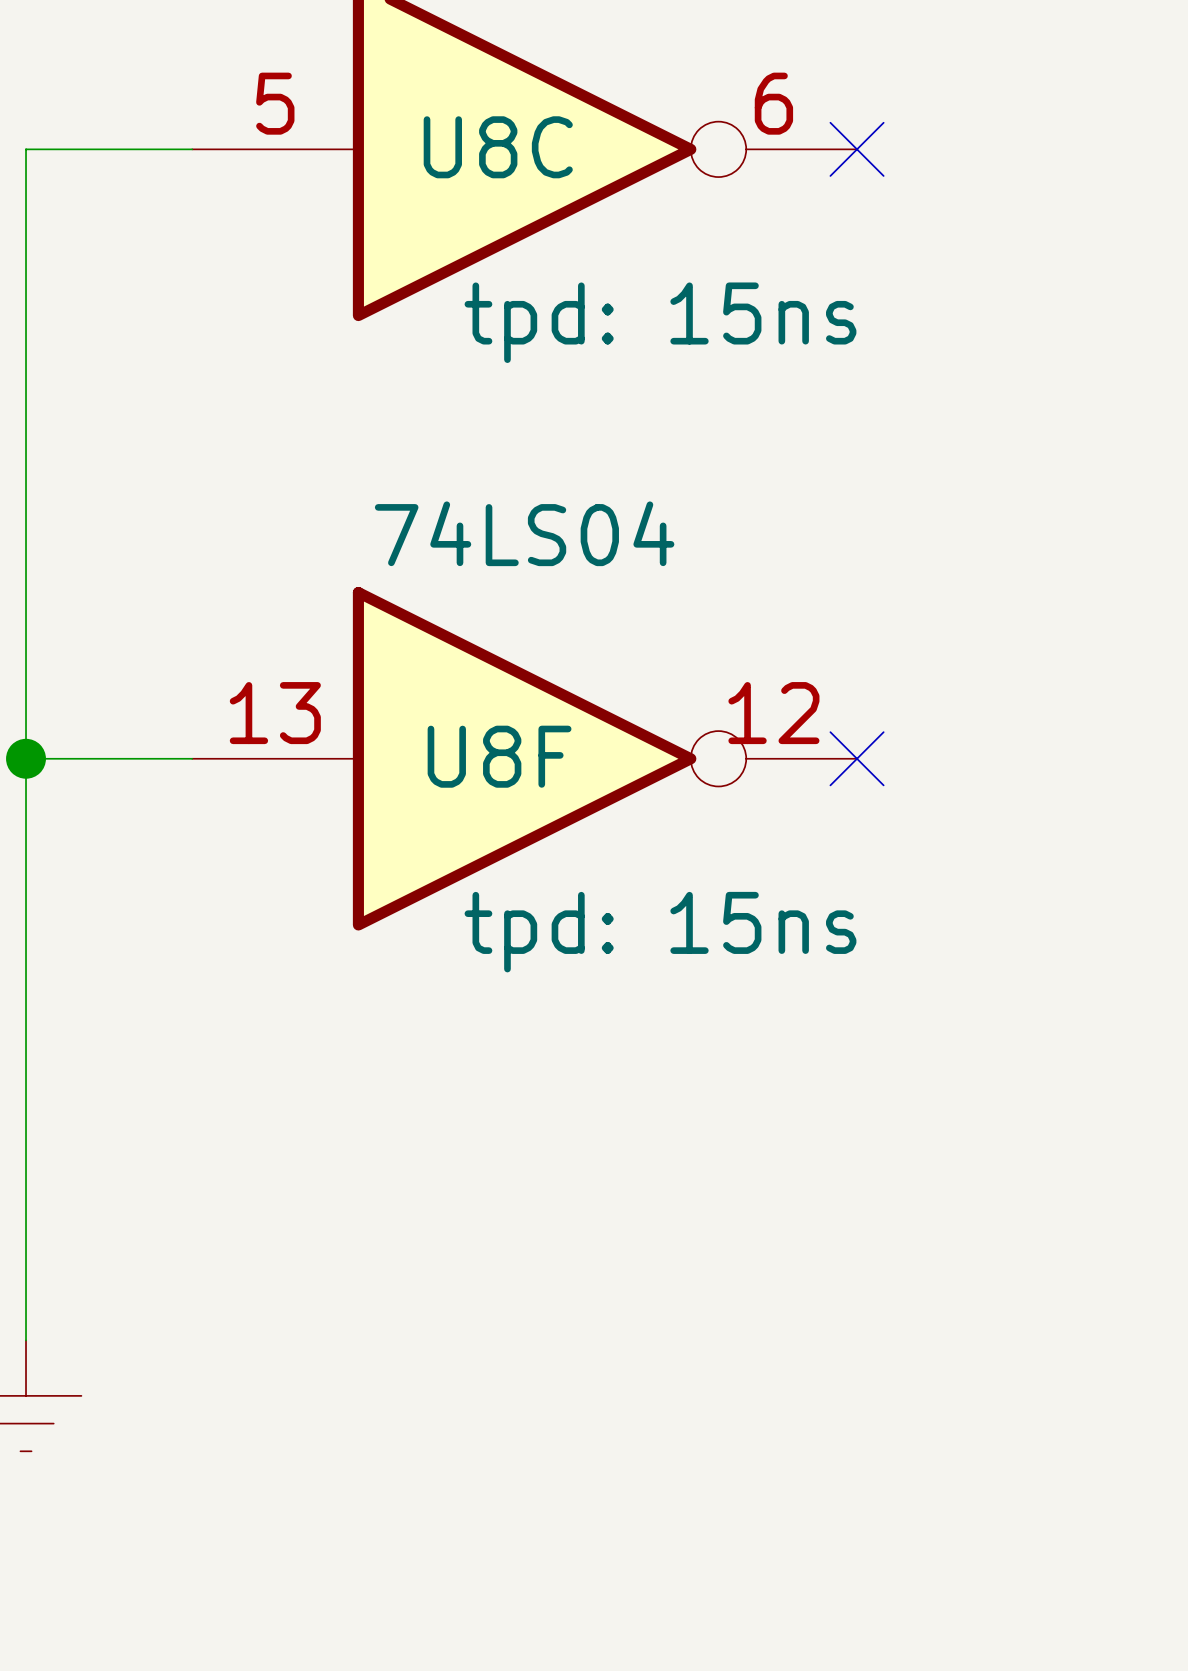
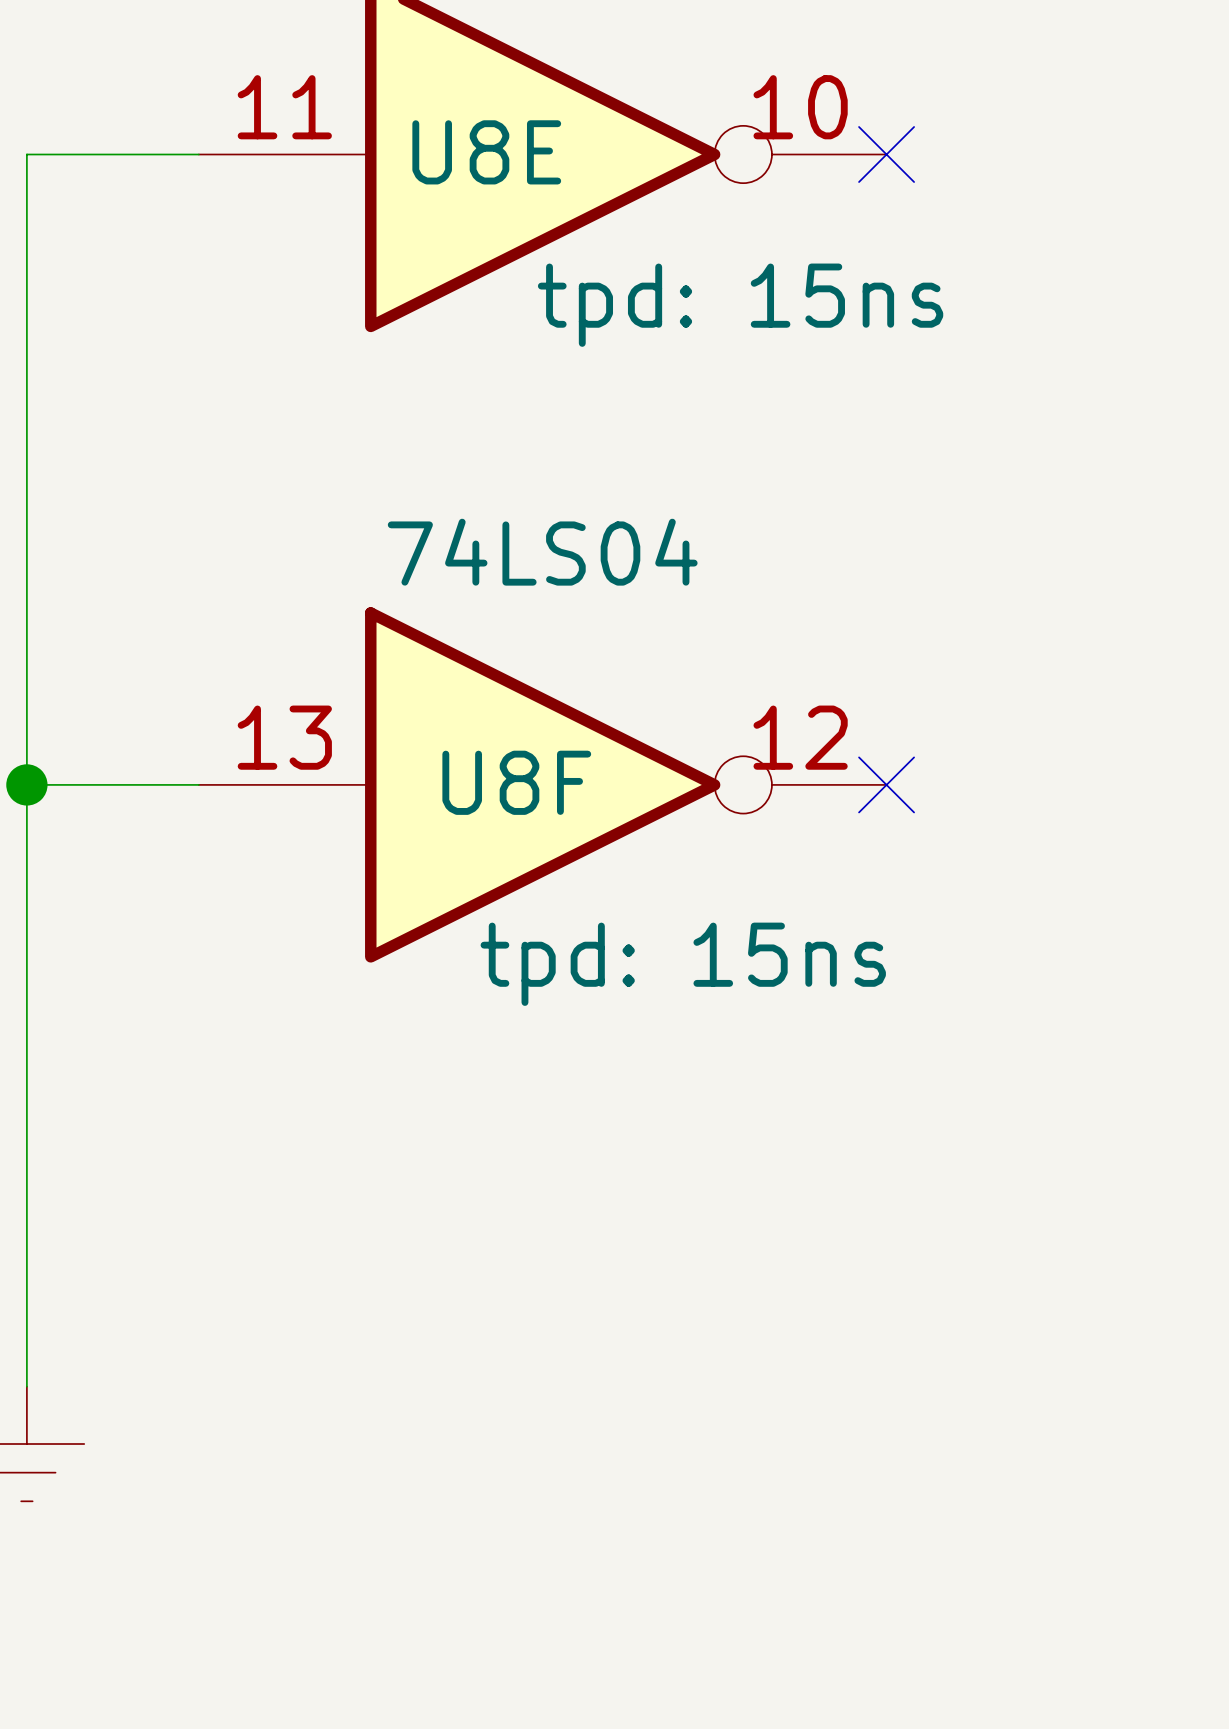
U8C pin number: 5 (275, 103) -> 11 (284, 107)
U8C pin number: 6 (773, 103) -> 10 (800, 107)
U8C name: U8C (498, 147) -> U8E (486, 152)
U8C text position: tpd: 15ns (660, 322) -> tpd: 15ns (740, 305)

